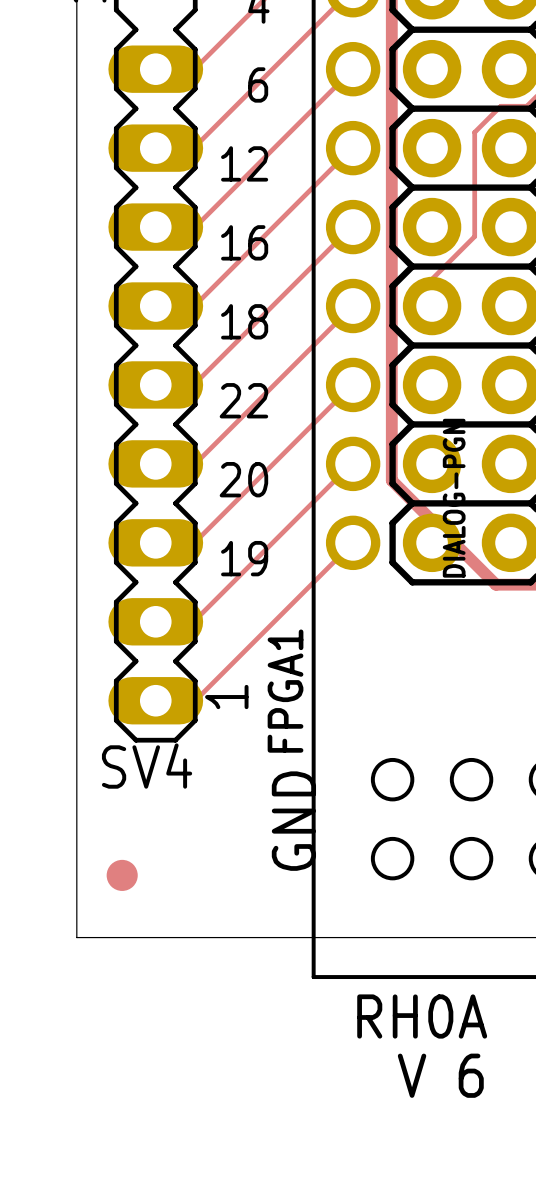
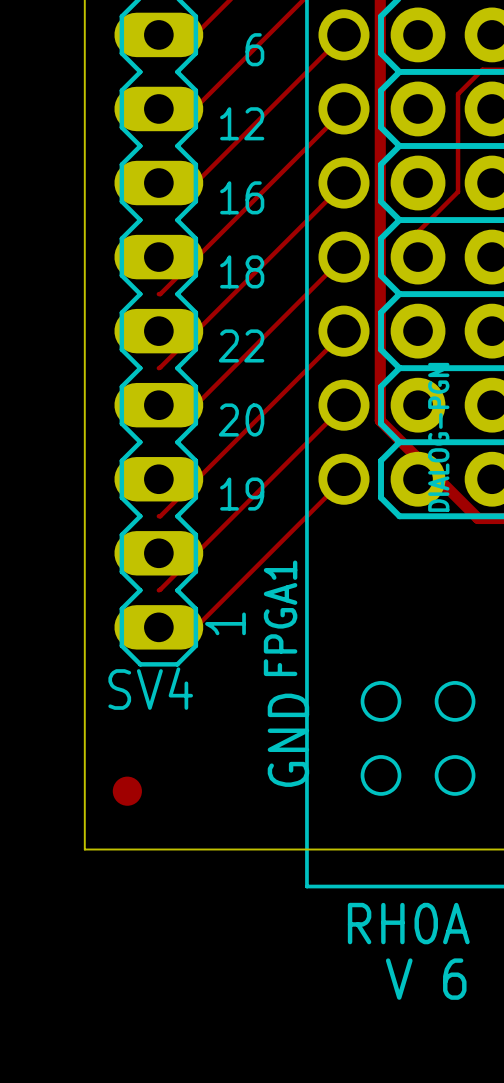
track: (353, 148) (195, 305) (155, 306) -> (343, 108) (158, 294)
track: (353, 227) (195, 383) (157, 383) (155, 384) -> (343, 183) (158, 368)
track: (353, 384) (195, 542) (155, 542) -> (343, 331) (158, 516)
track: (353, 463) (195, 620) (157, 620) (155, 621) -> (343, 405) (158, 590)

